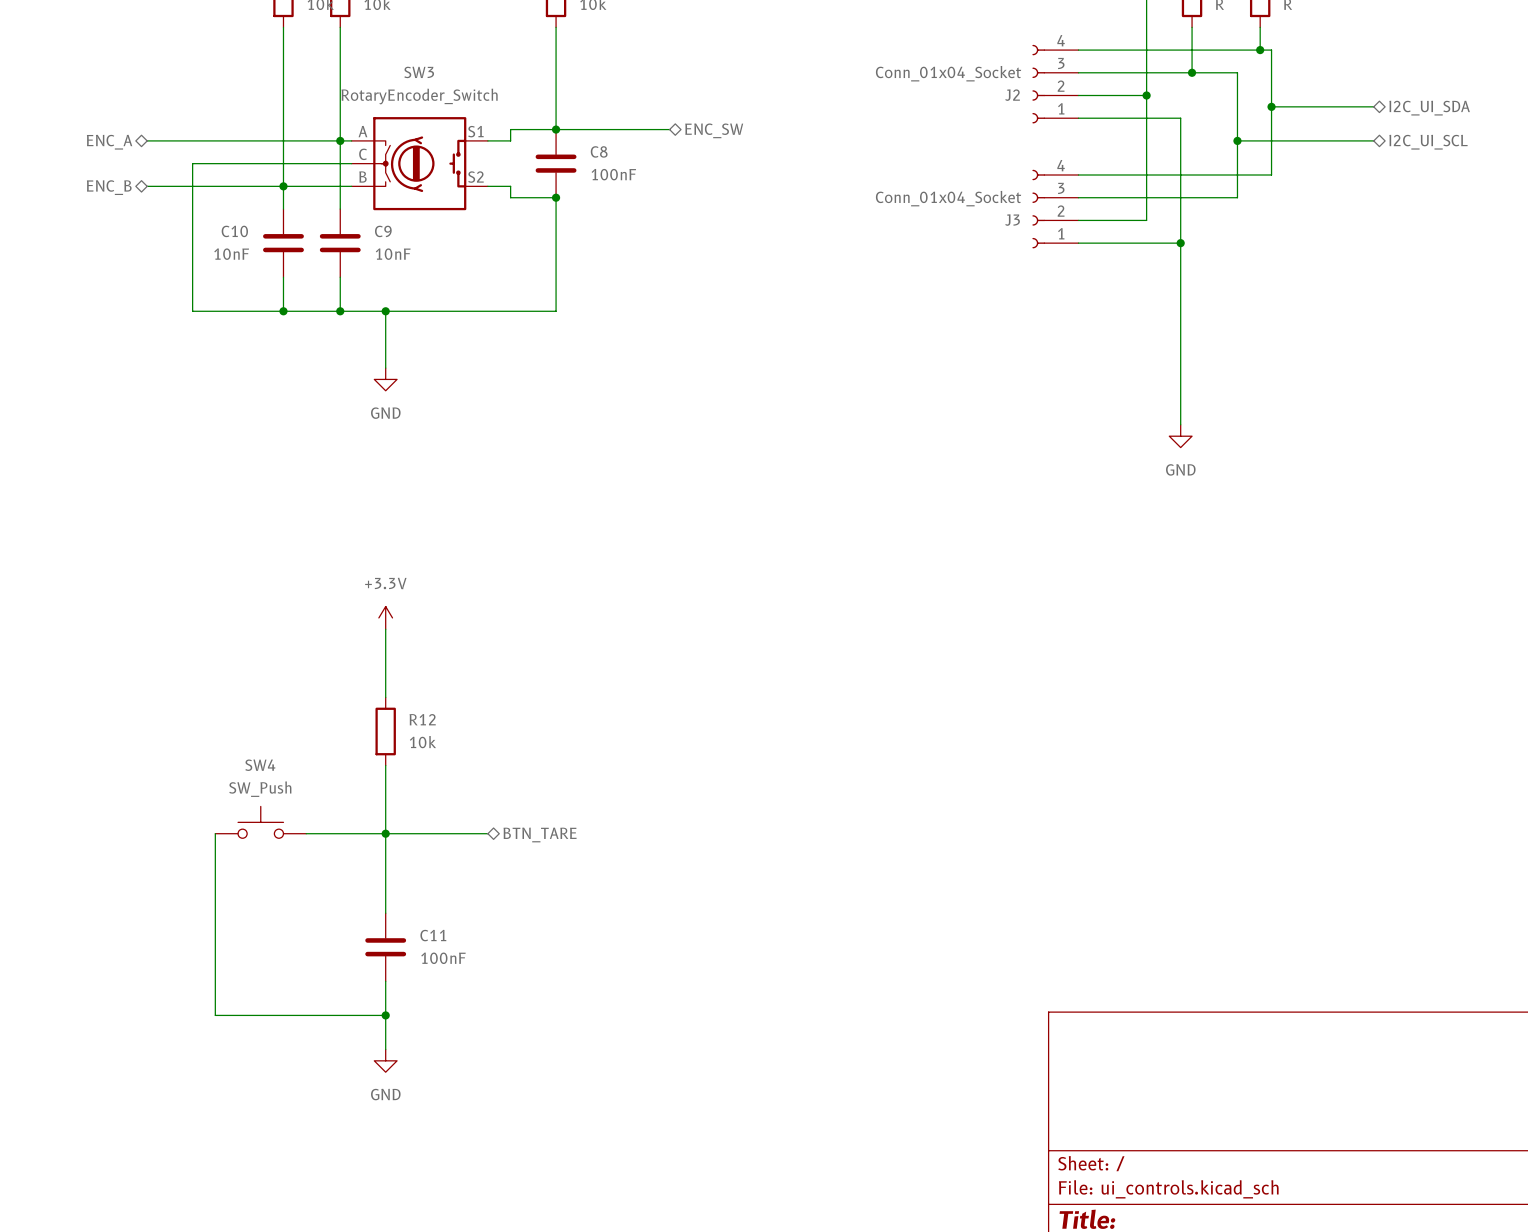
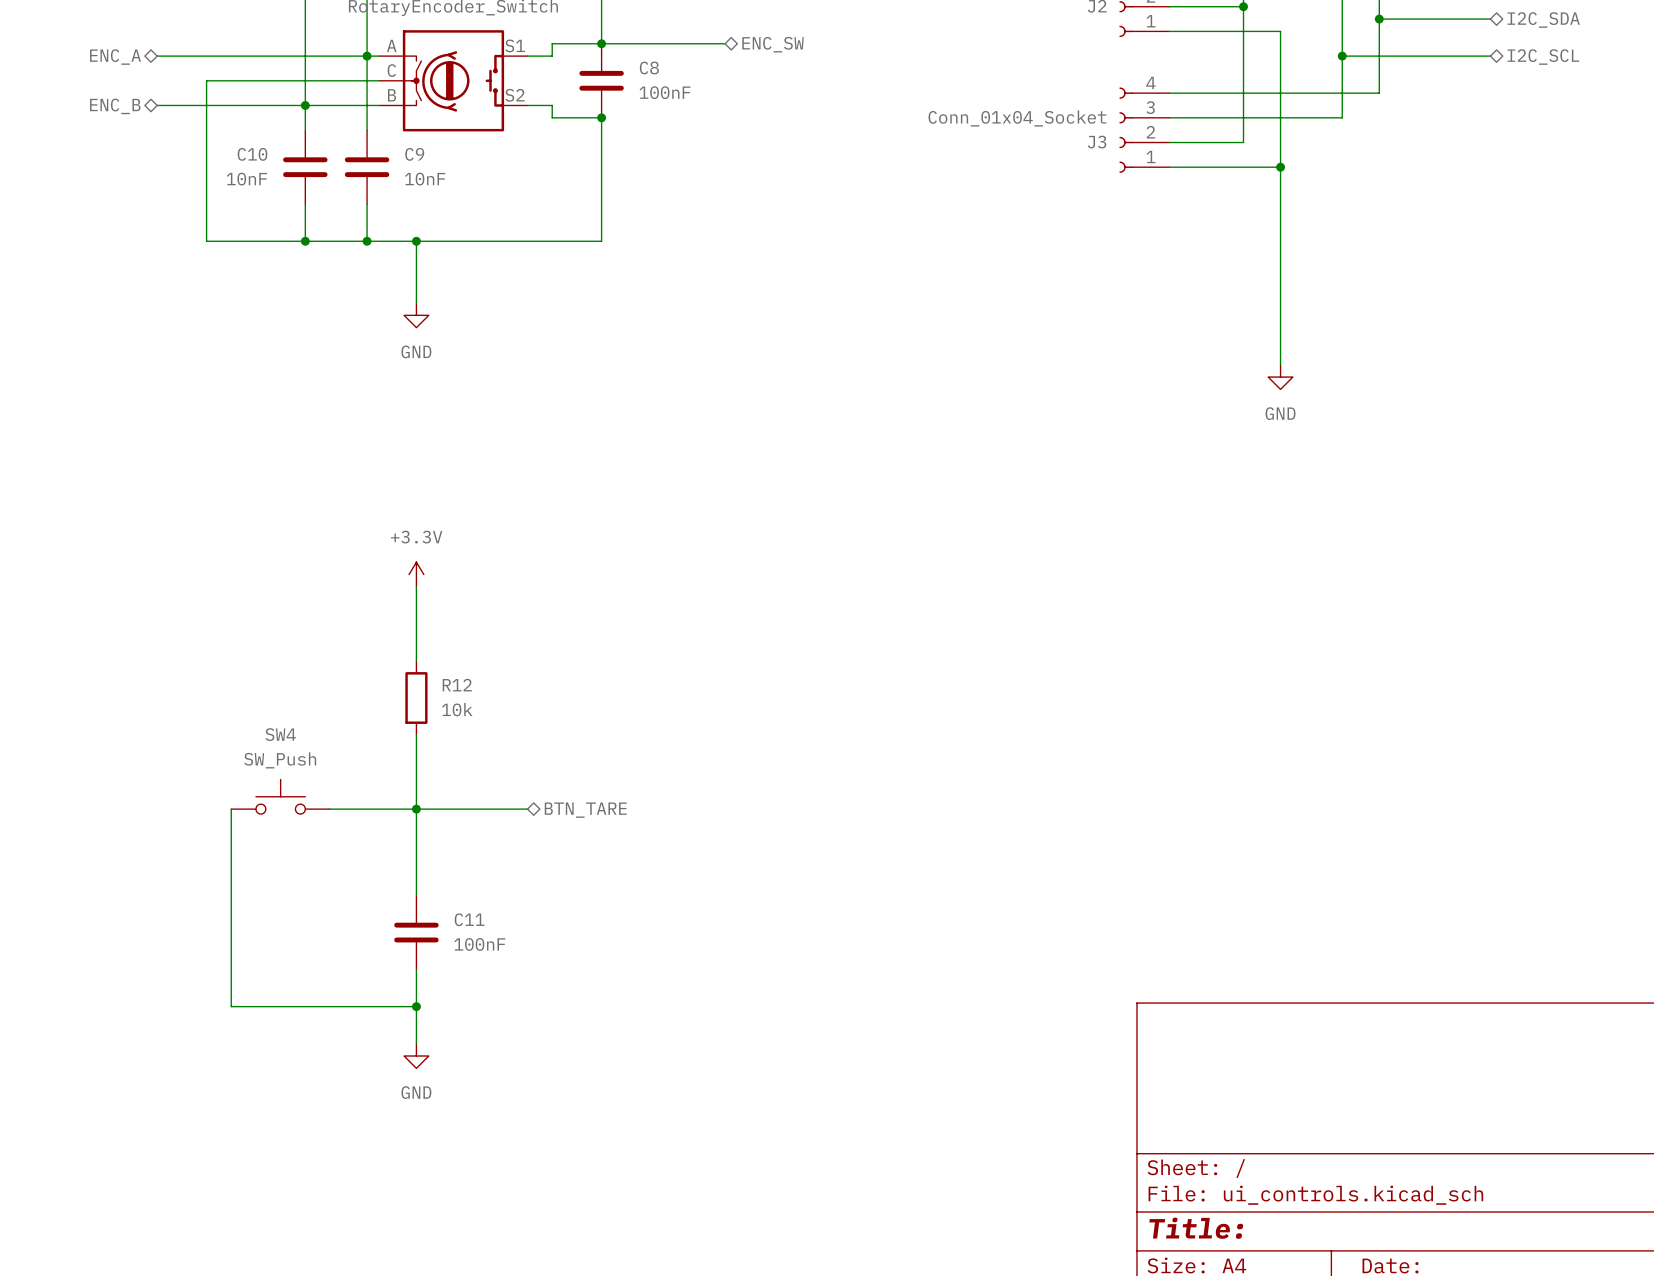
hierarchical label: I2C_UI_SDA (1429, 108) -> I2C_SDA (1543, 19)
hierarchical label: I2C_UI_SCL (1428, 142) -> I2C_SCL (1543, 57)

